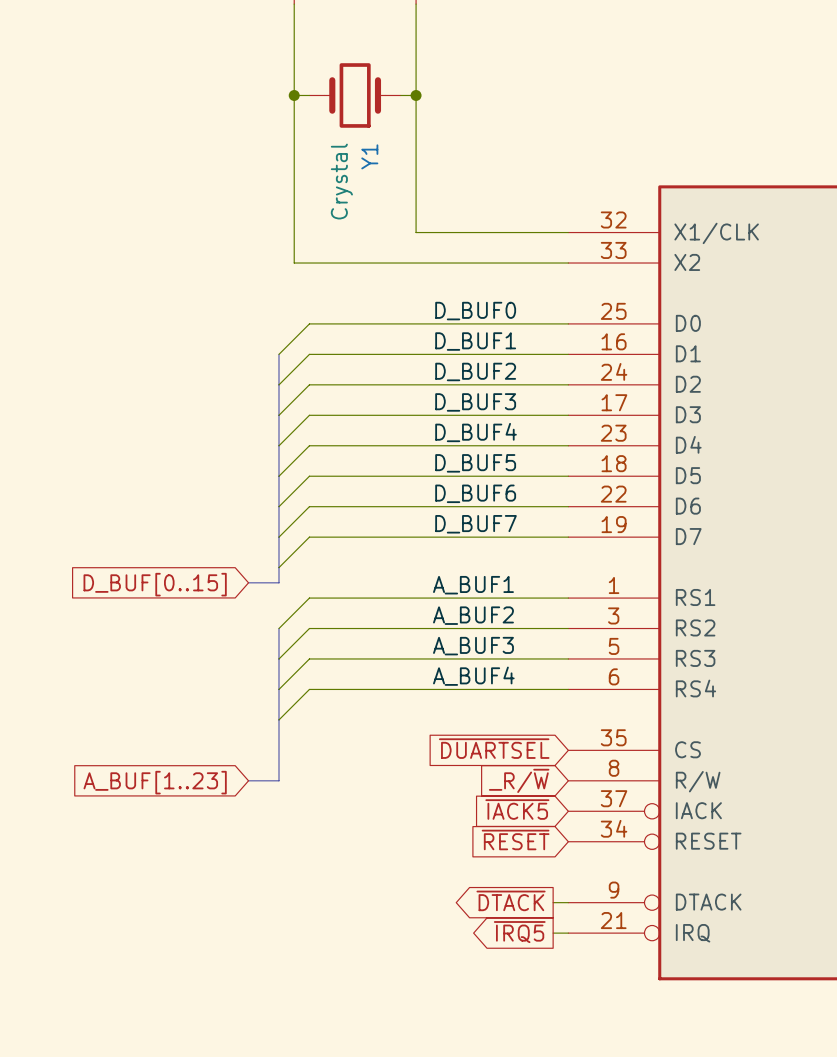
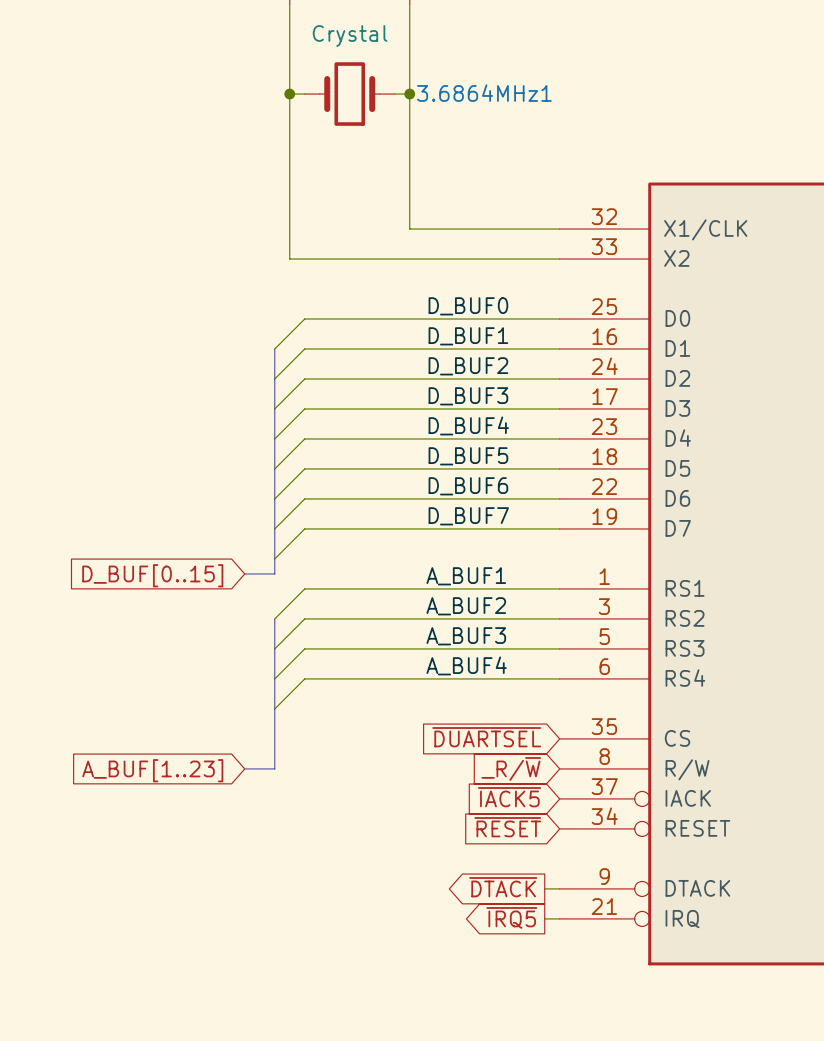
Y1 name: Y1 (369, 156) -> 3.6864MHz1 (484, 93)
Y1 value rotation: 0° (341, 181) -> 90° clockwise (350, 35)
Y1 value position: Crystal (341, 181) -> Crystal (350, 35)

